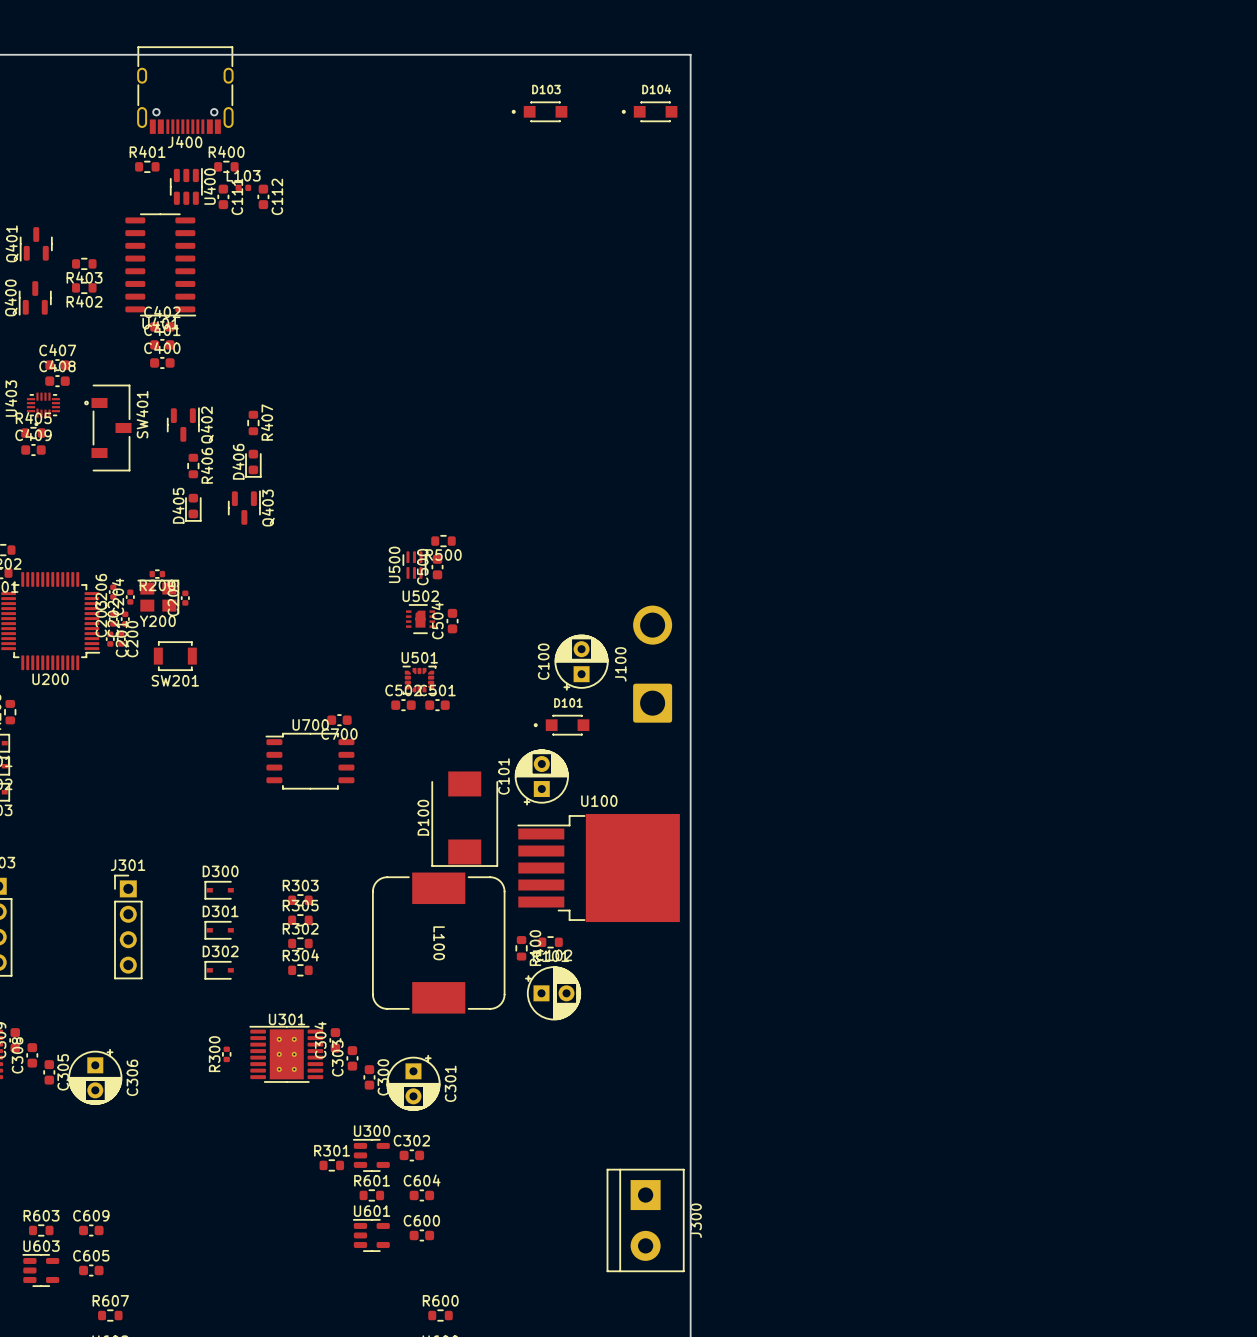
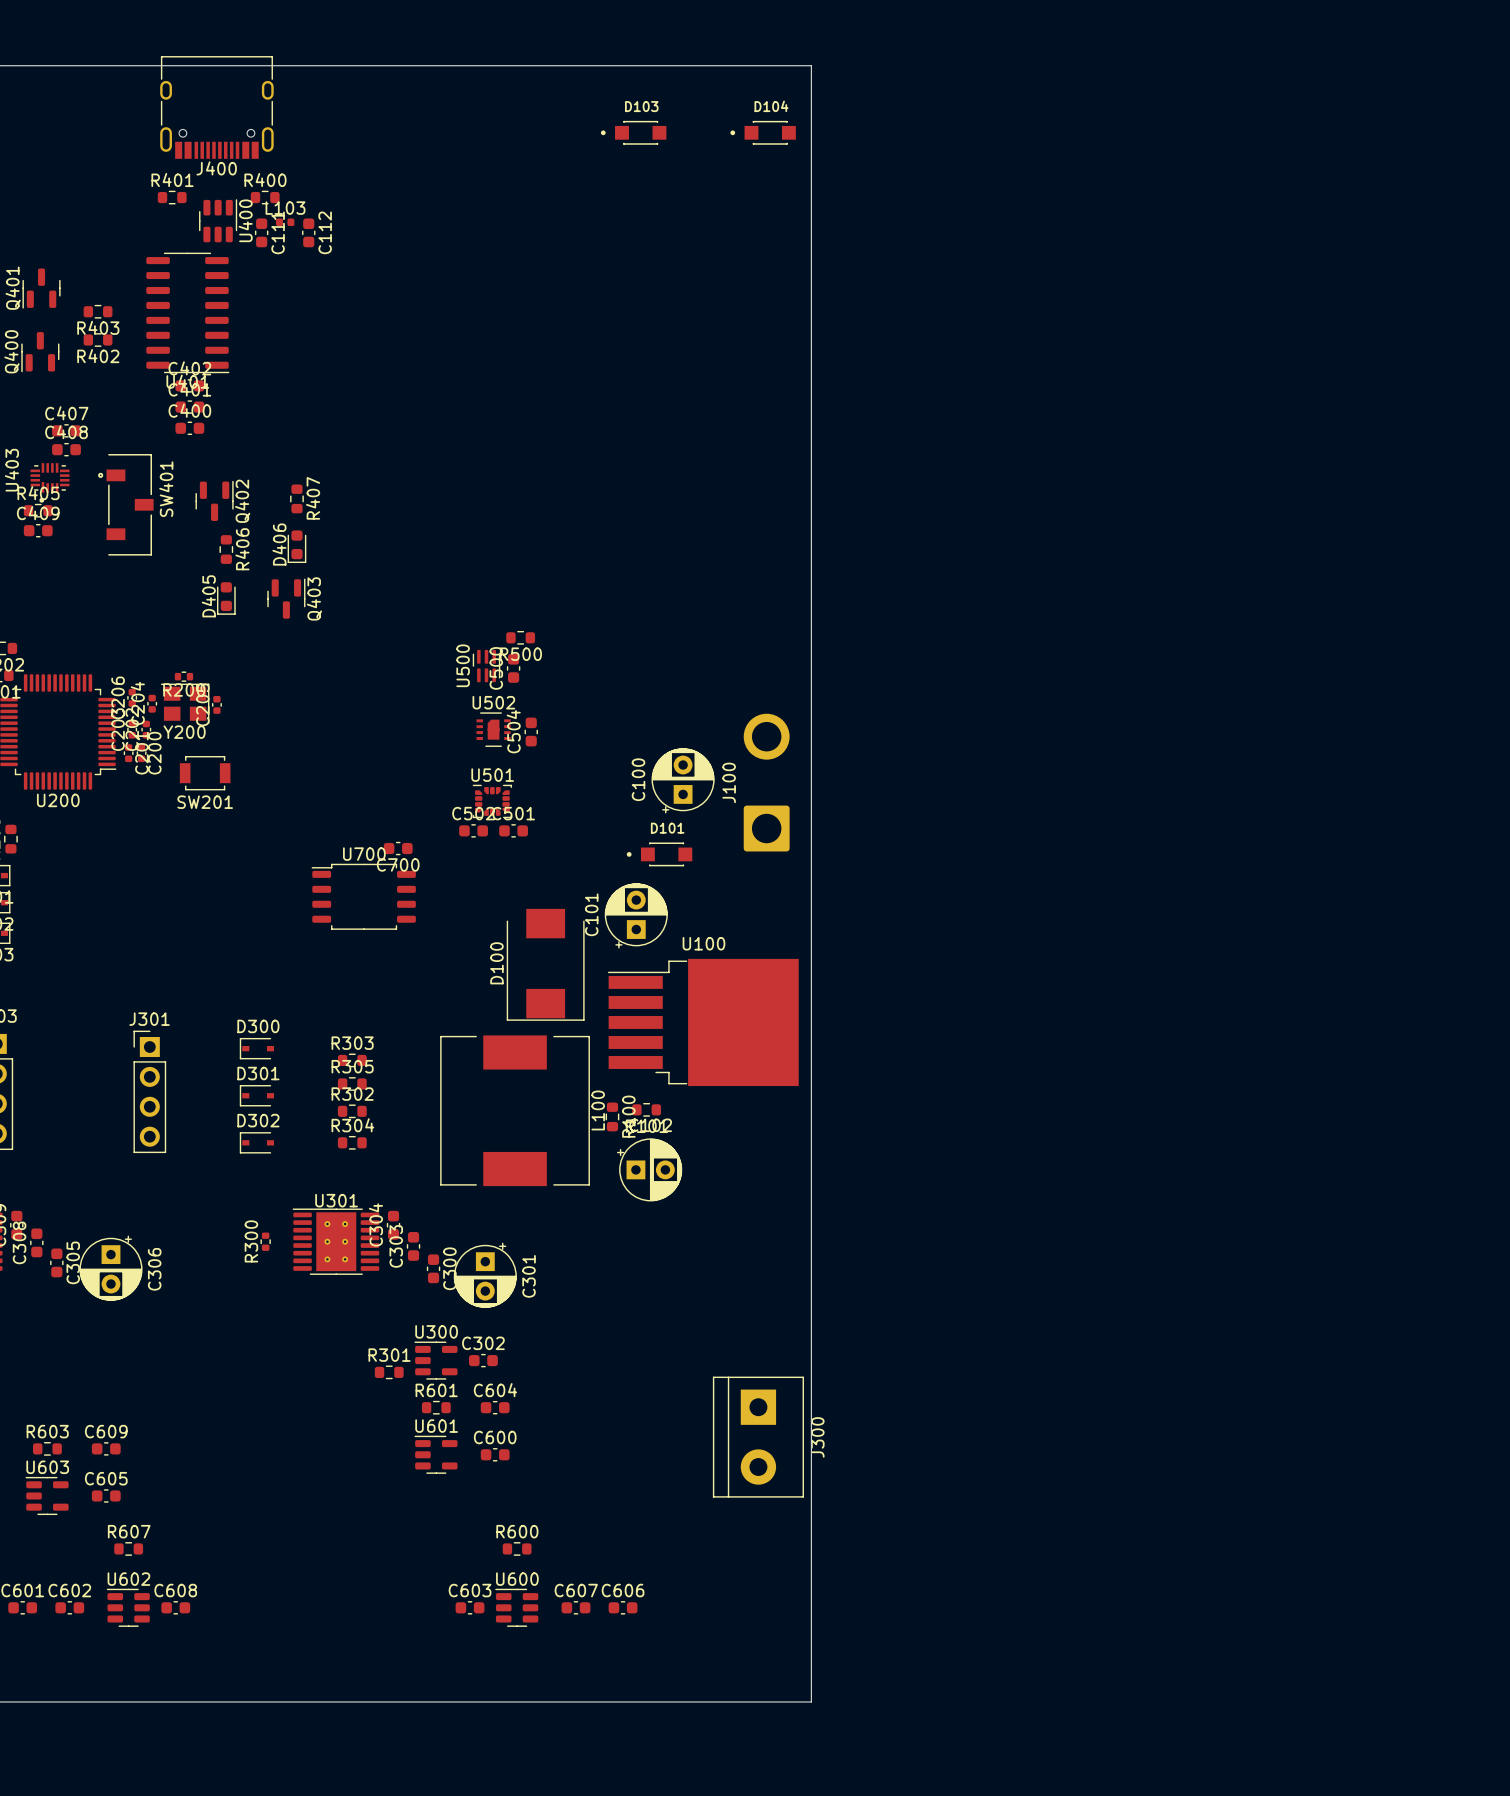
L100 footprint: [372, 872, 506, 1014] -> [440, 1035, 590, 1187]
L100 name rotation: 0° (439, 943) -> 180° (598, 1110)
L100 name position: L100 (439, 943) -> L100 (598, 1110)

